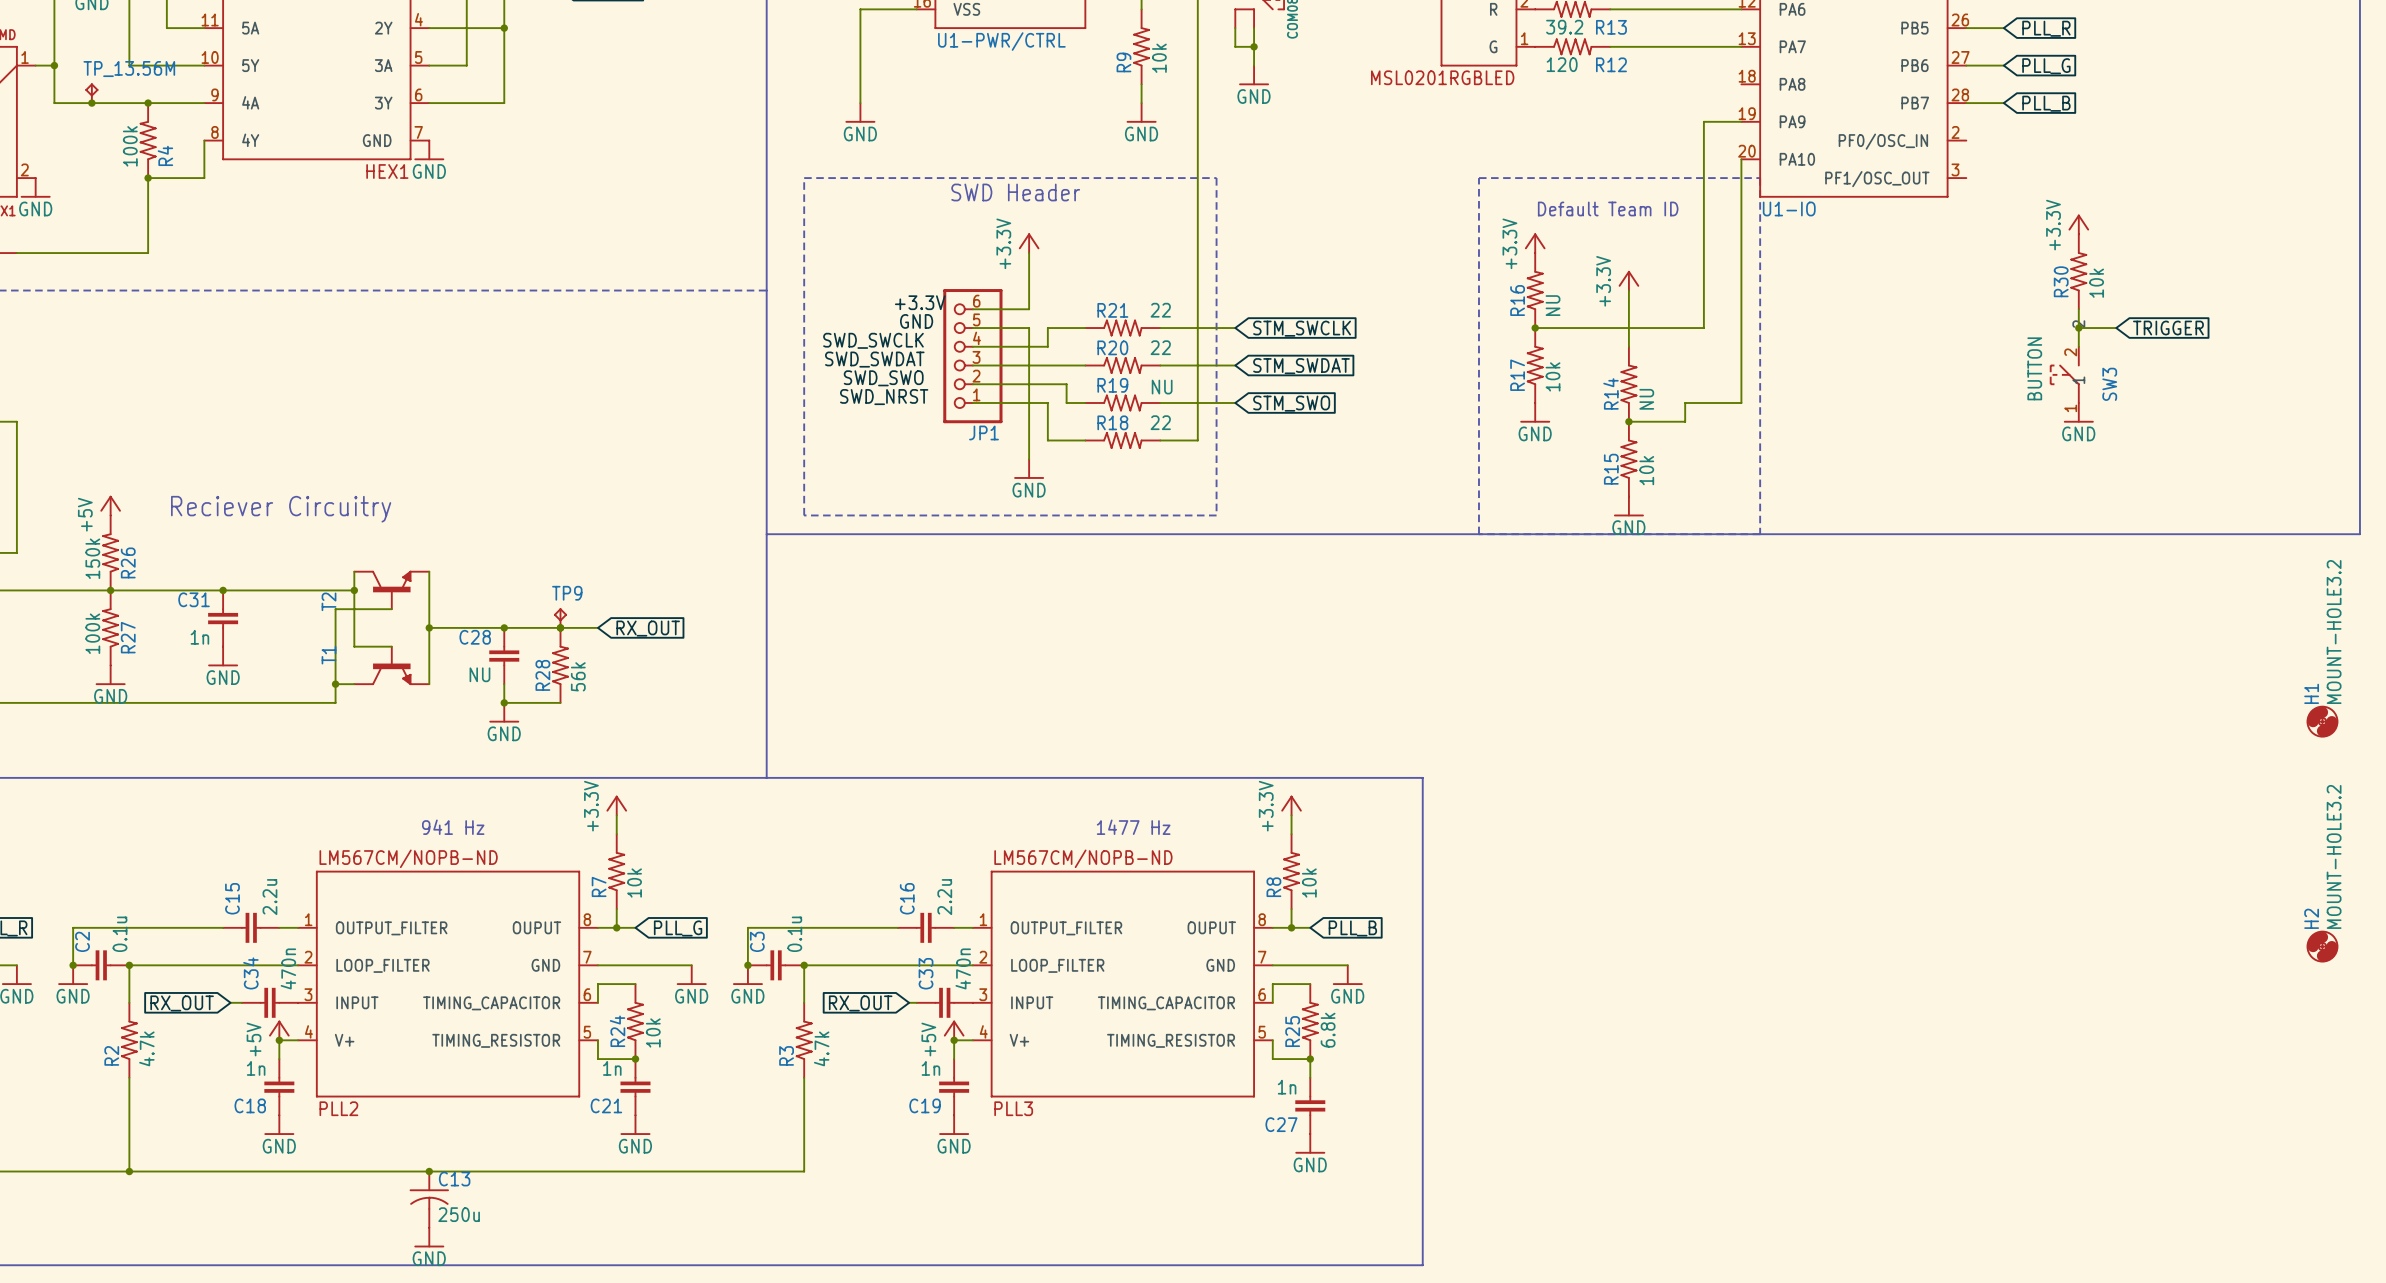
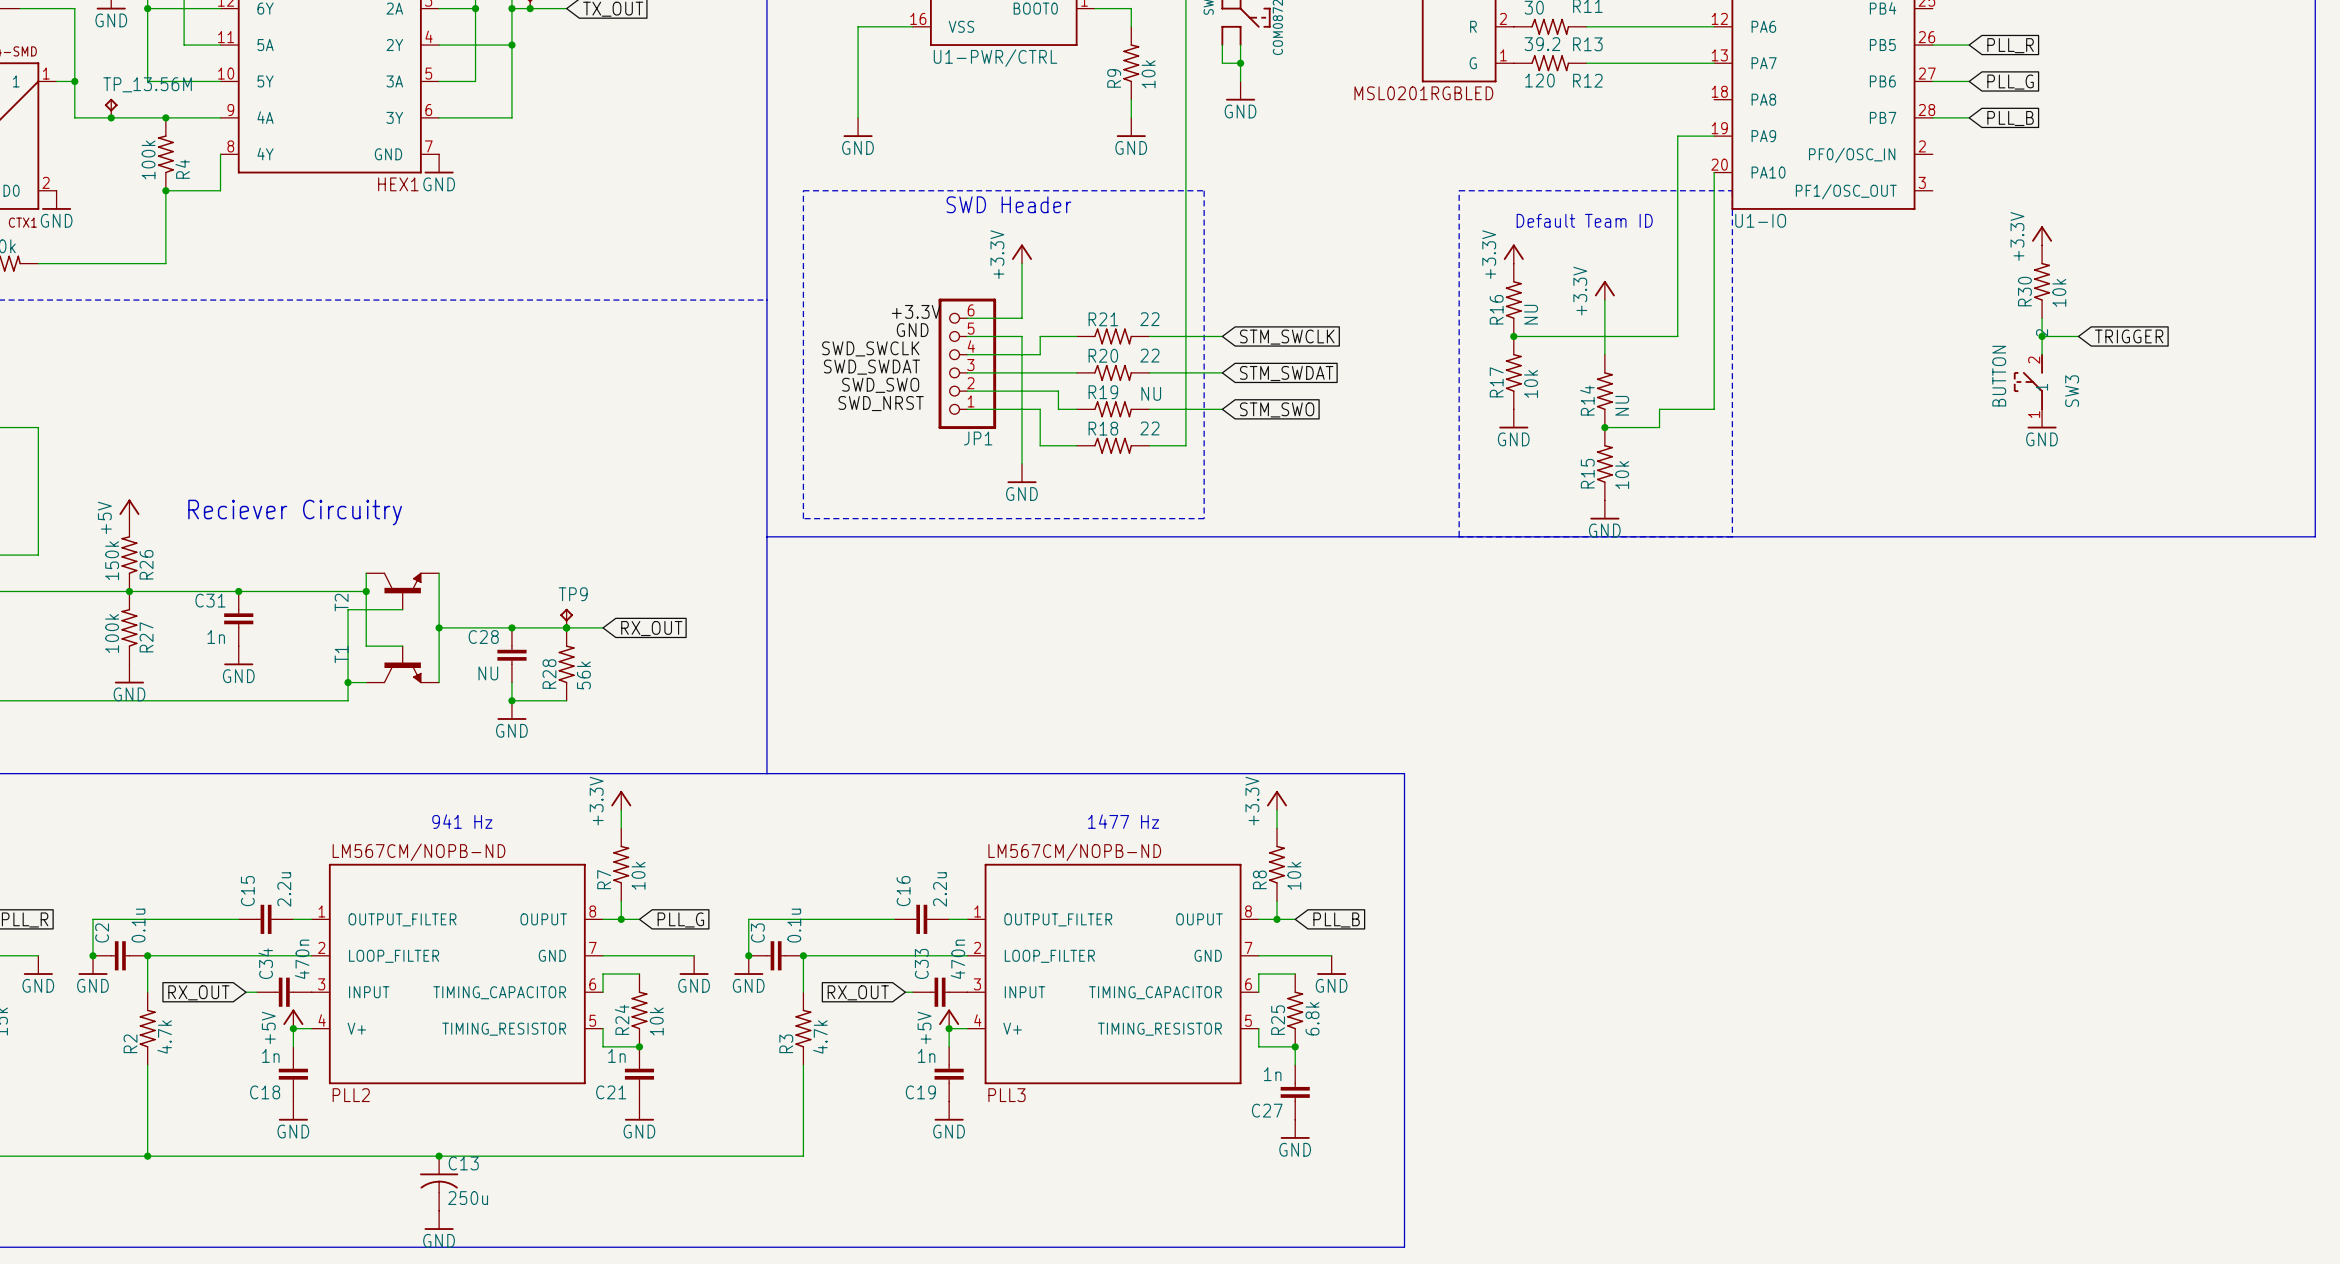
H1: MOUNT-HOLE3.2 (2322, 721) -> none
H2: MOUNT-HOLE3.2 (2322, 946) -> none

